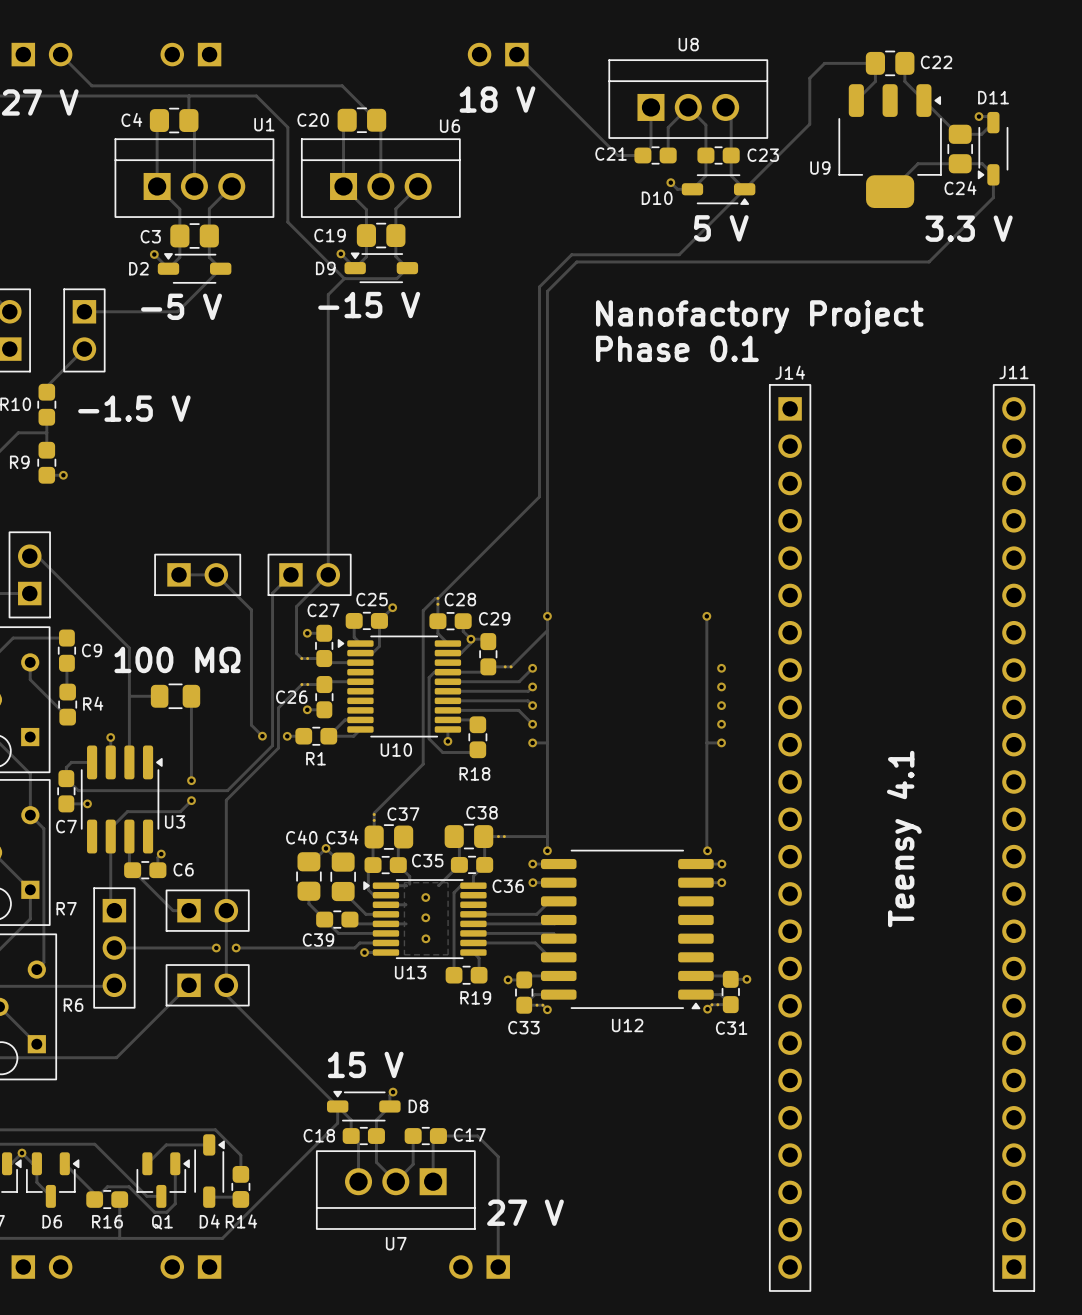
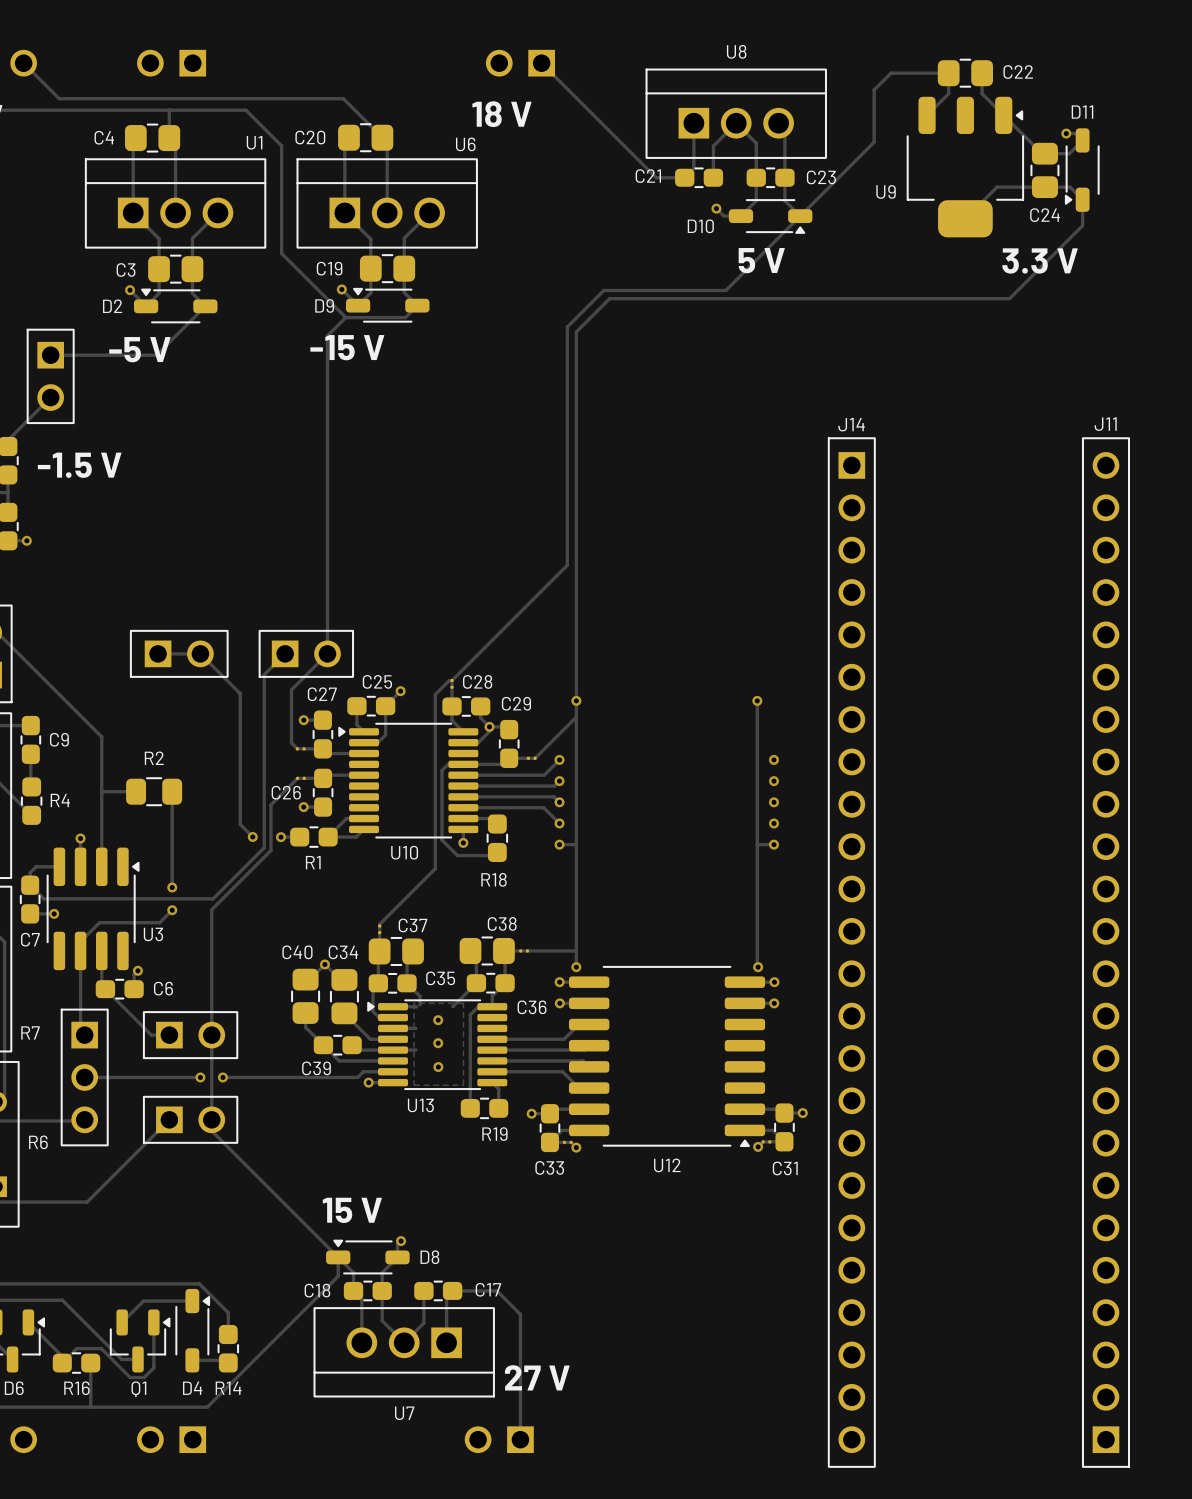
text: Nanofactory Project (759, 317) -> none
text: Phase 0.1 (677, 348) -> none
text: 100 MΩ (177, 659) -> none
R2 name: none -> R2 (154, 758)
text: Teensy 4.1 (904, 839) -> none

